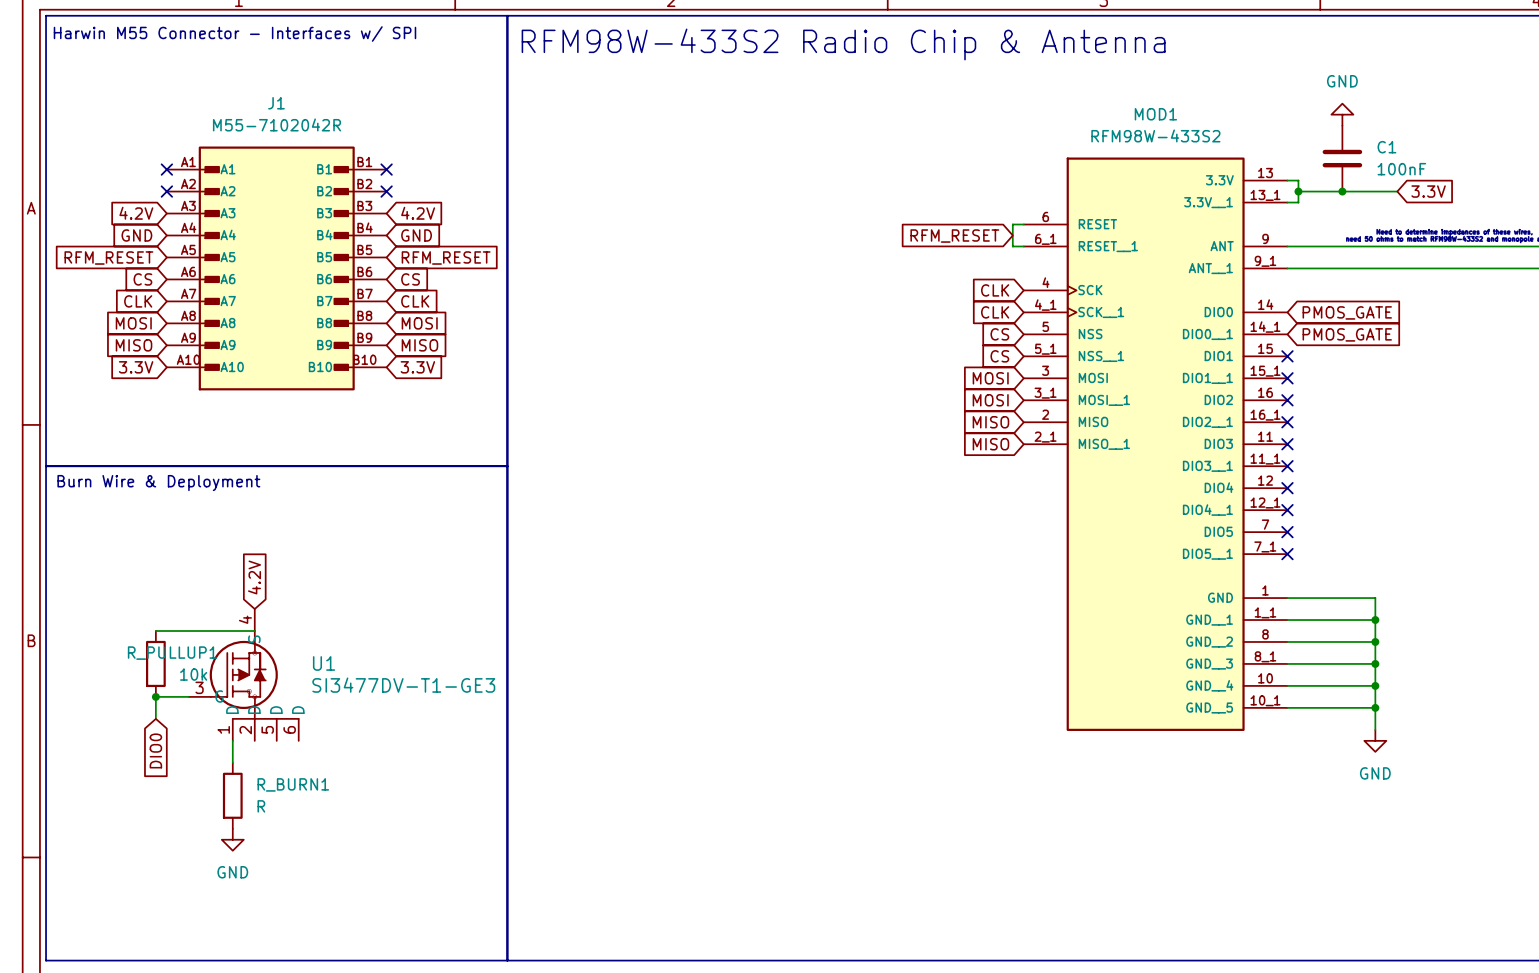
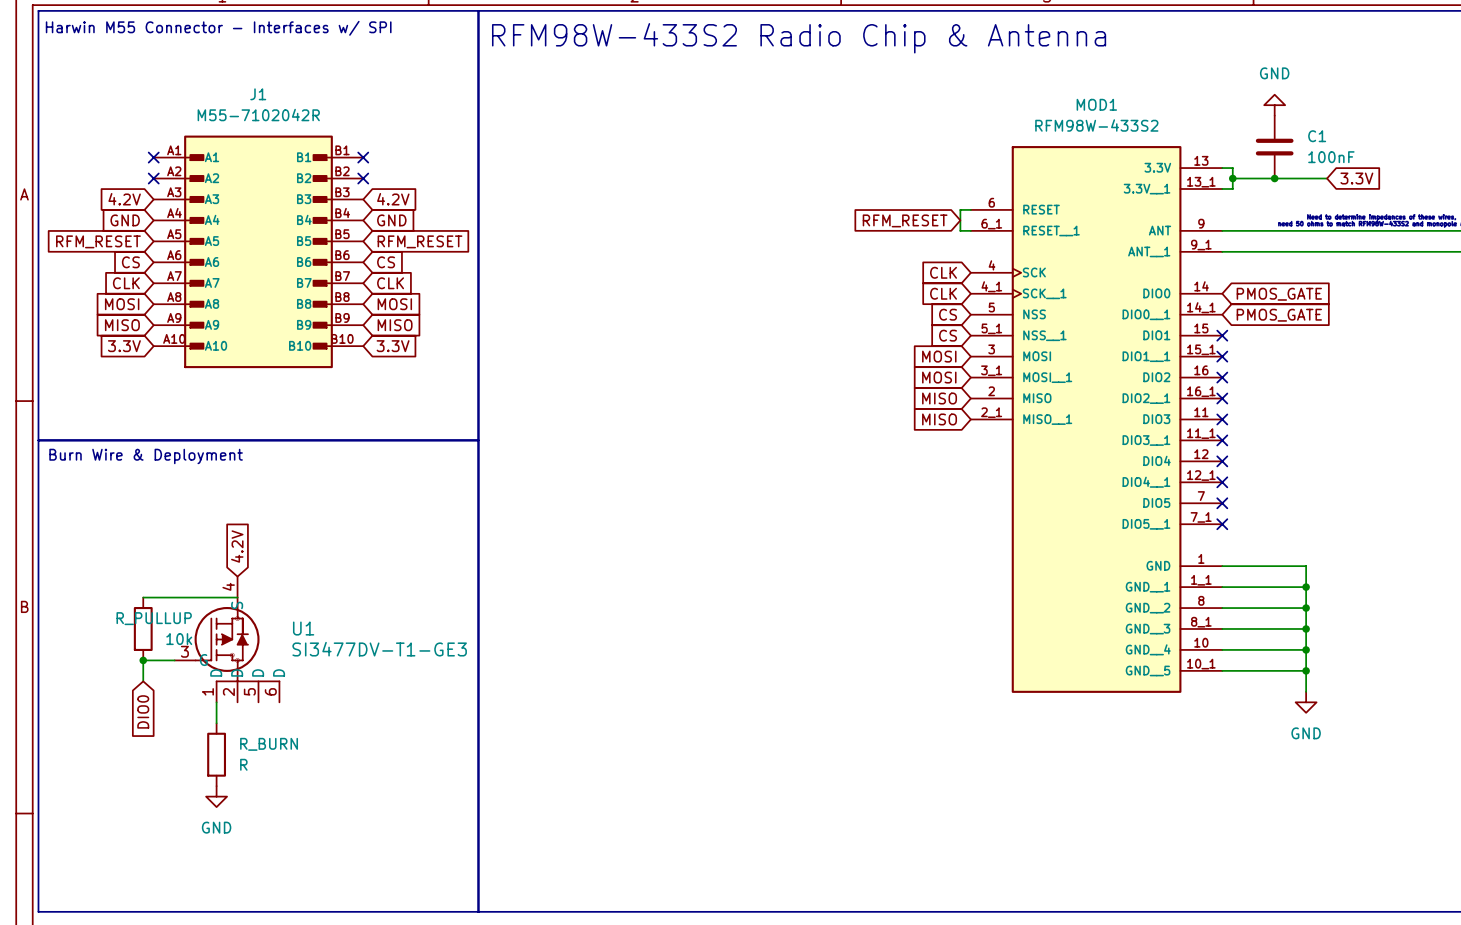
R_PULLUP1 name: R_PULLUP1 (172, 653) -> R_PULLUP (154, 618)
R_BURN1 name: R_BURN1 (293, 784) -> R_BURN (269, 744)

